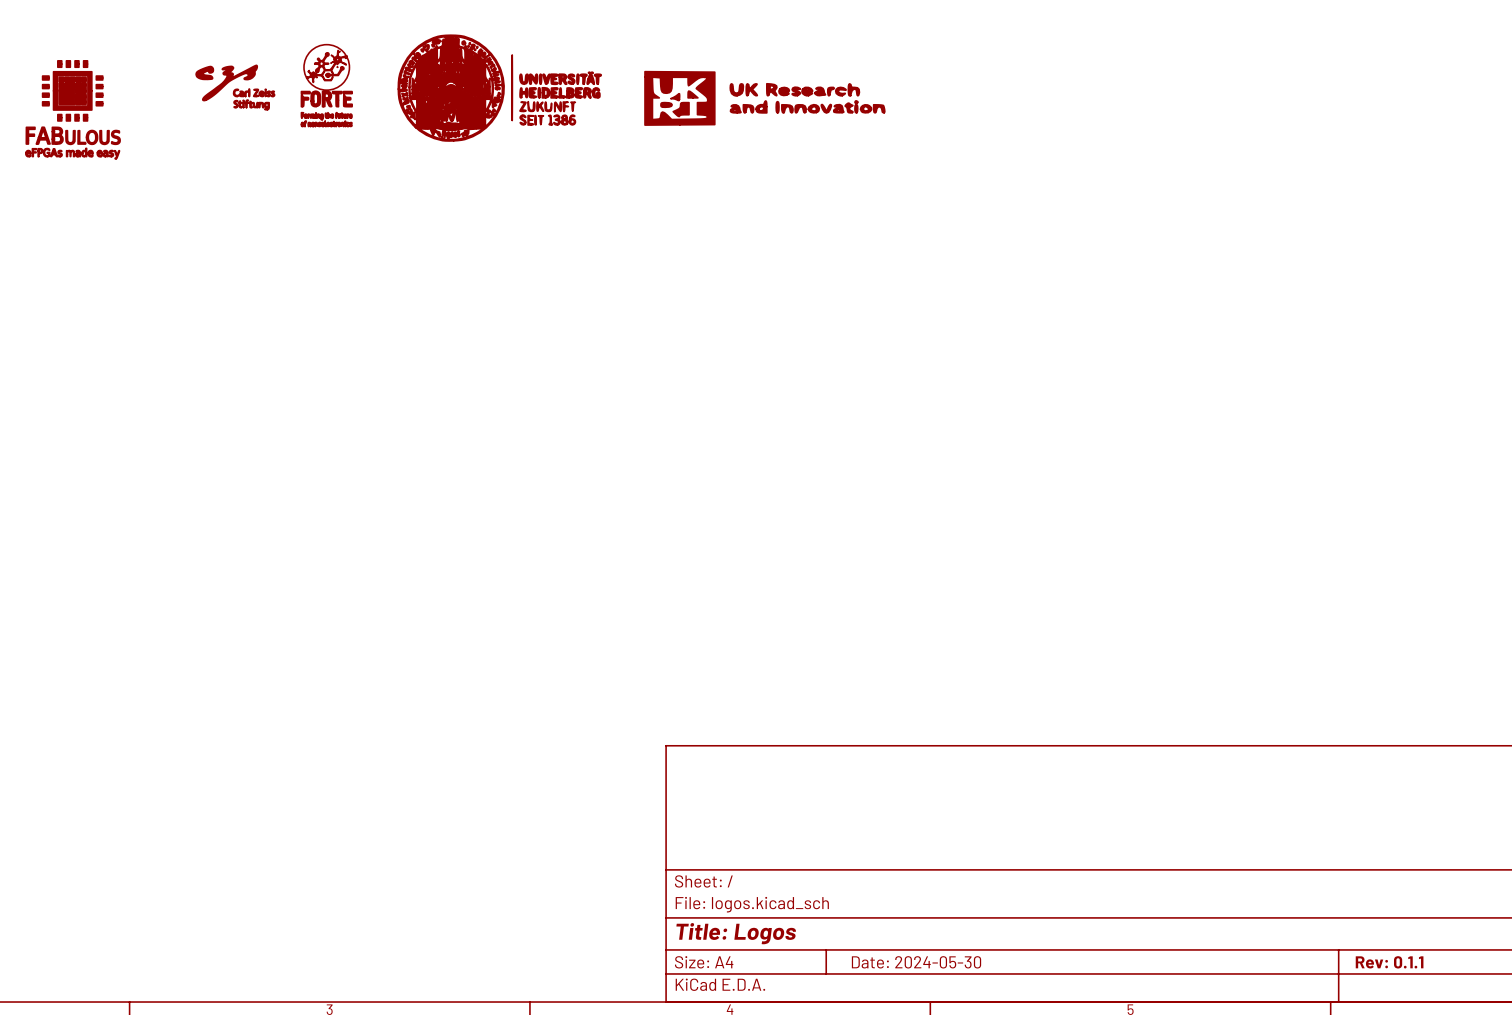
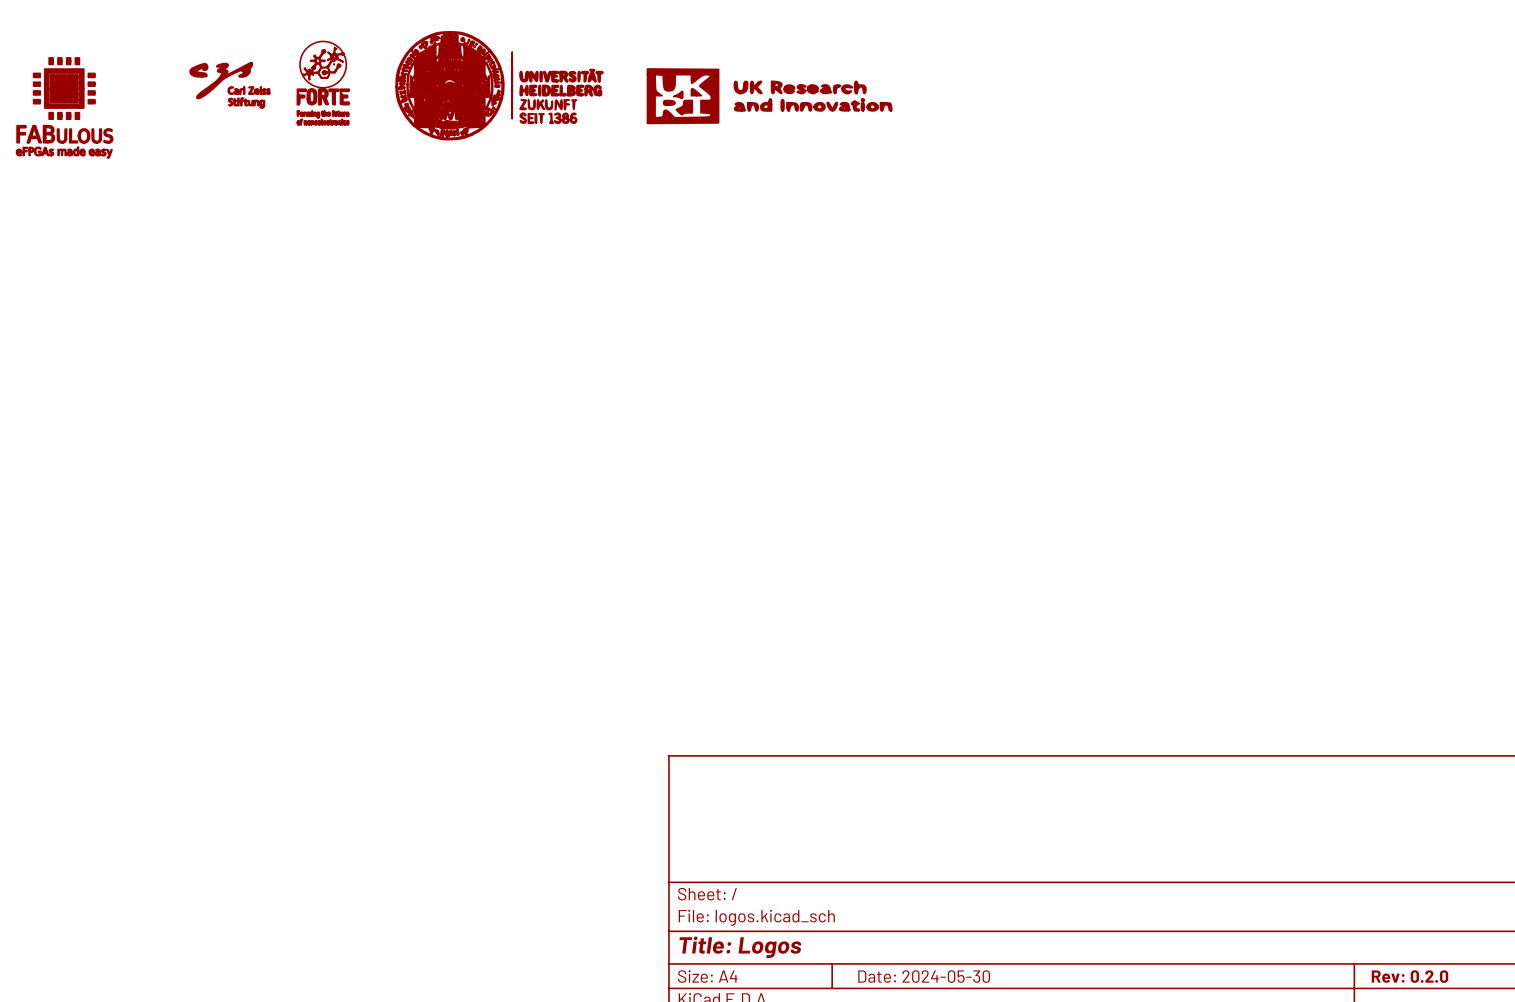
title block: Rev: 0.1.1 (1389, 962) -> Rev: 0.2.0 (1409, 976)

